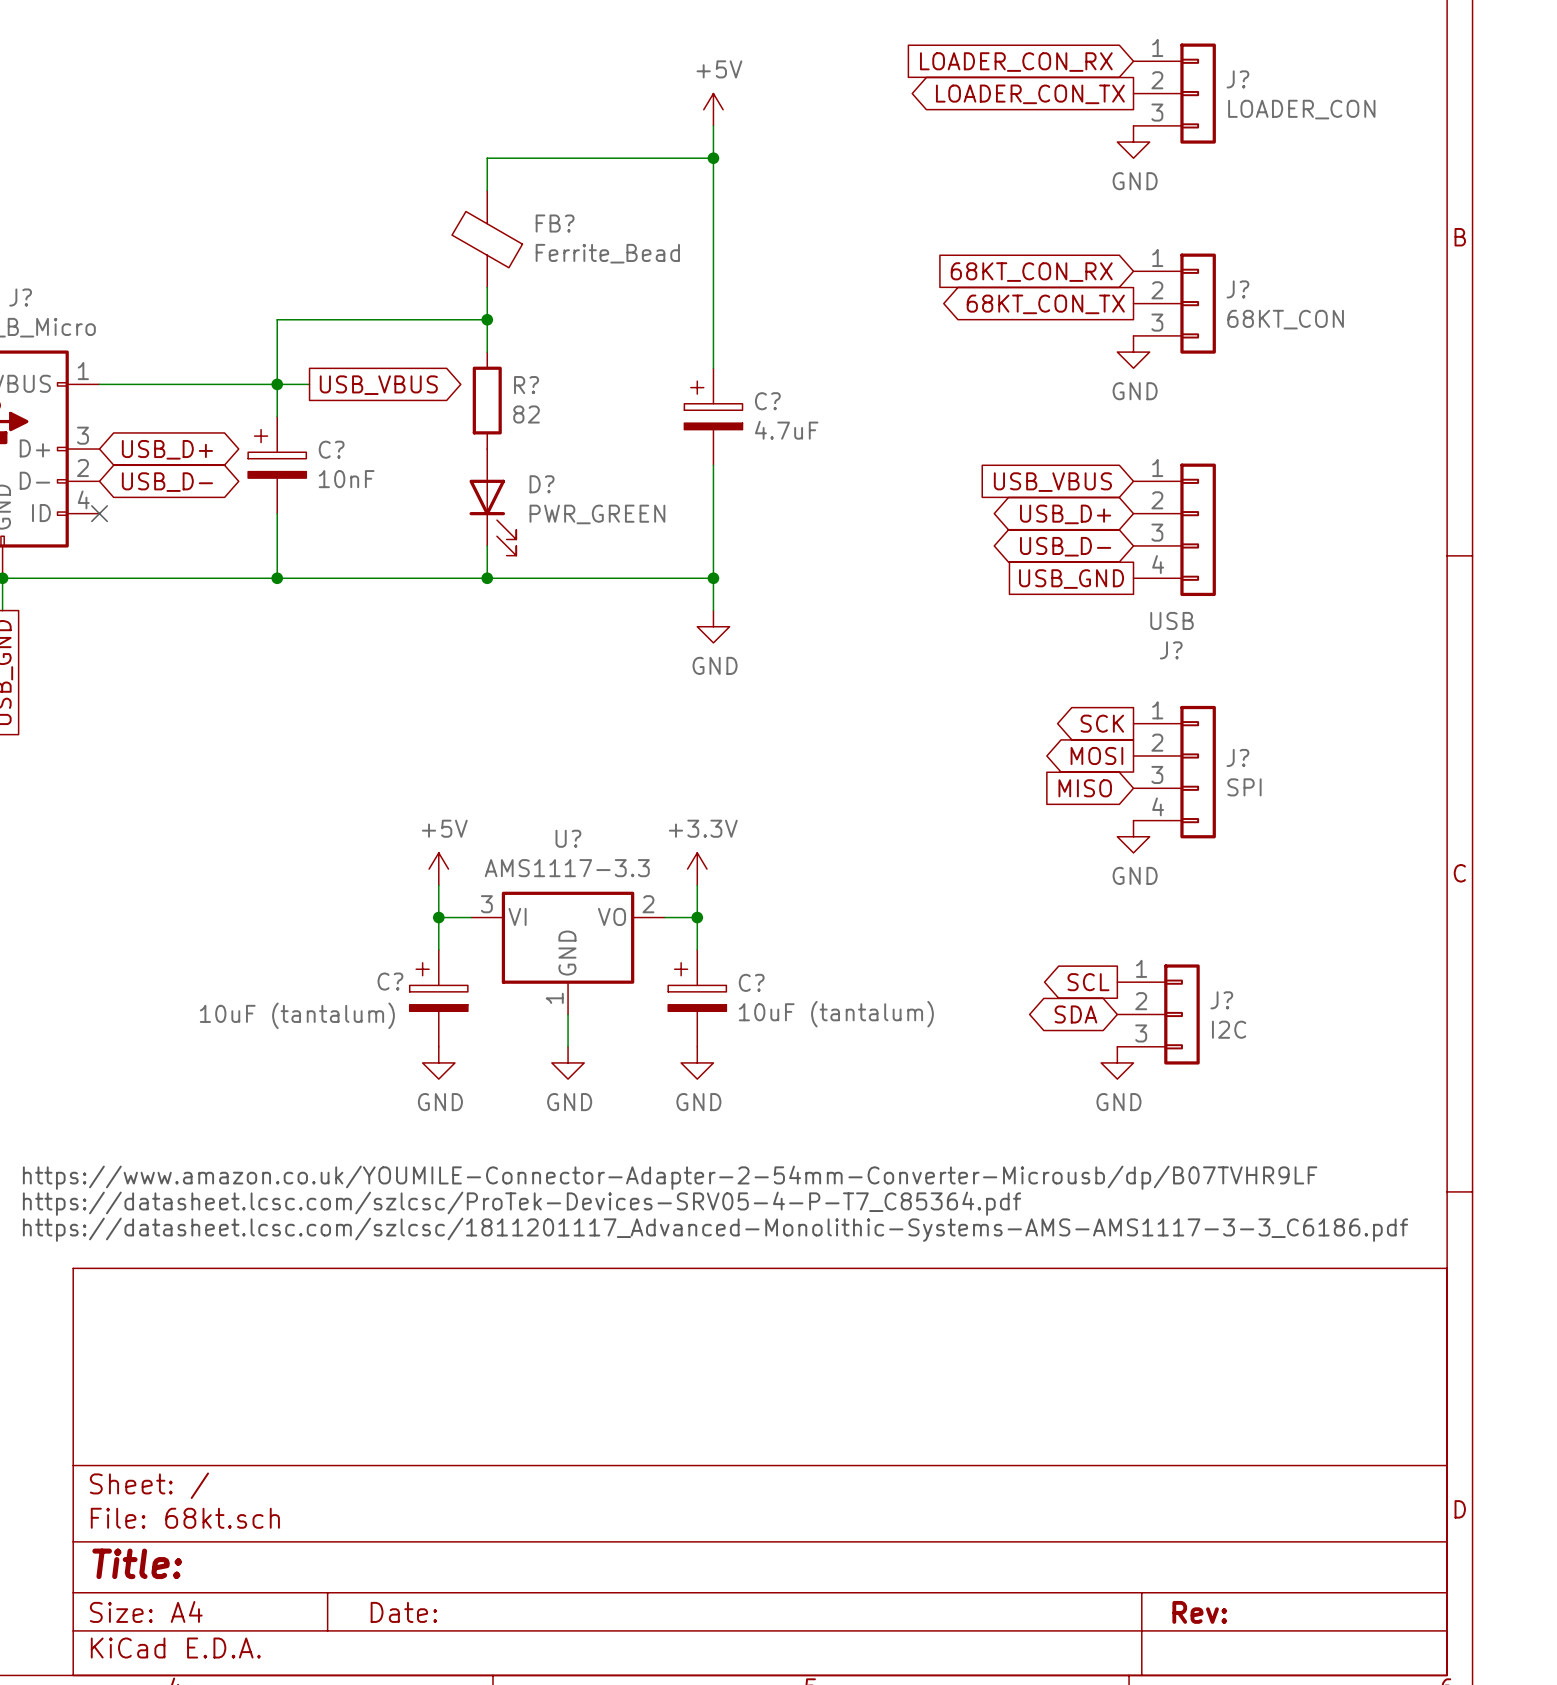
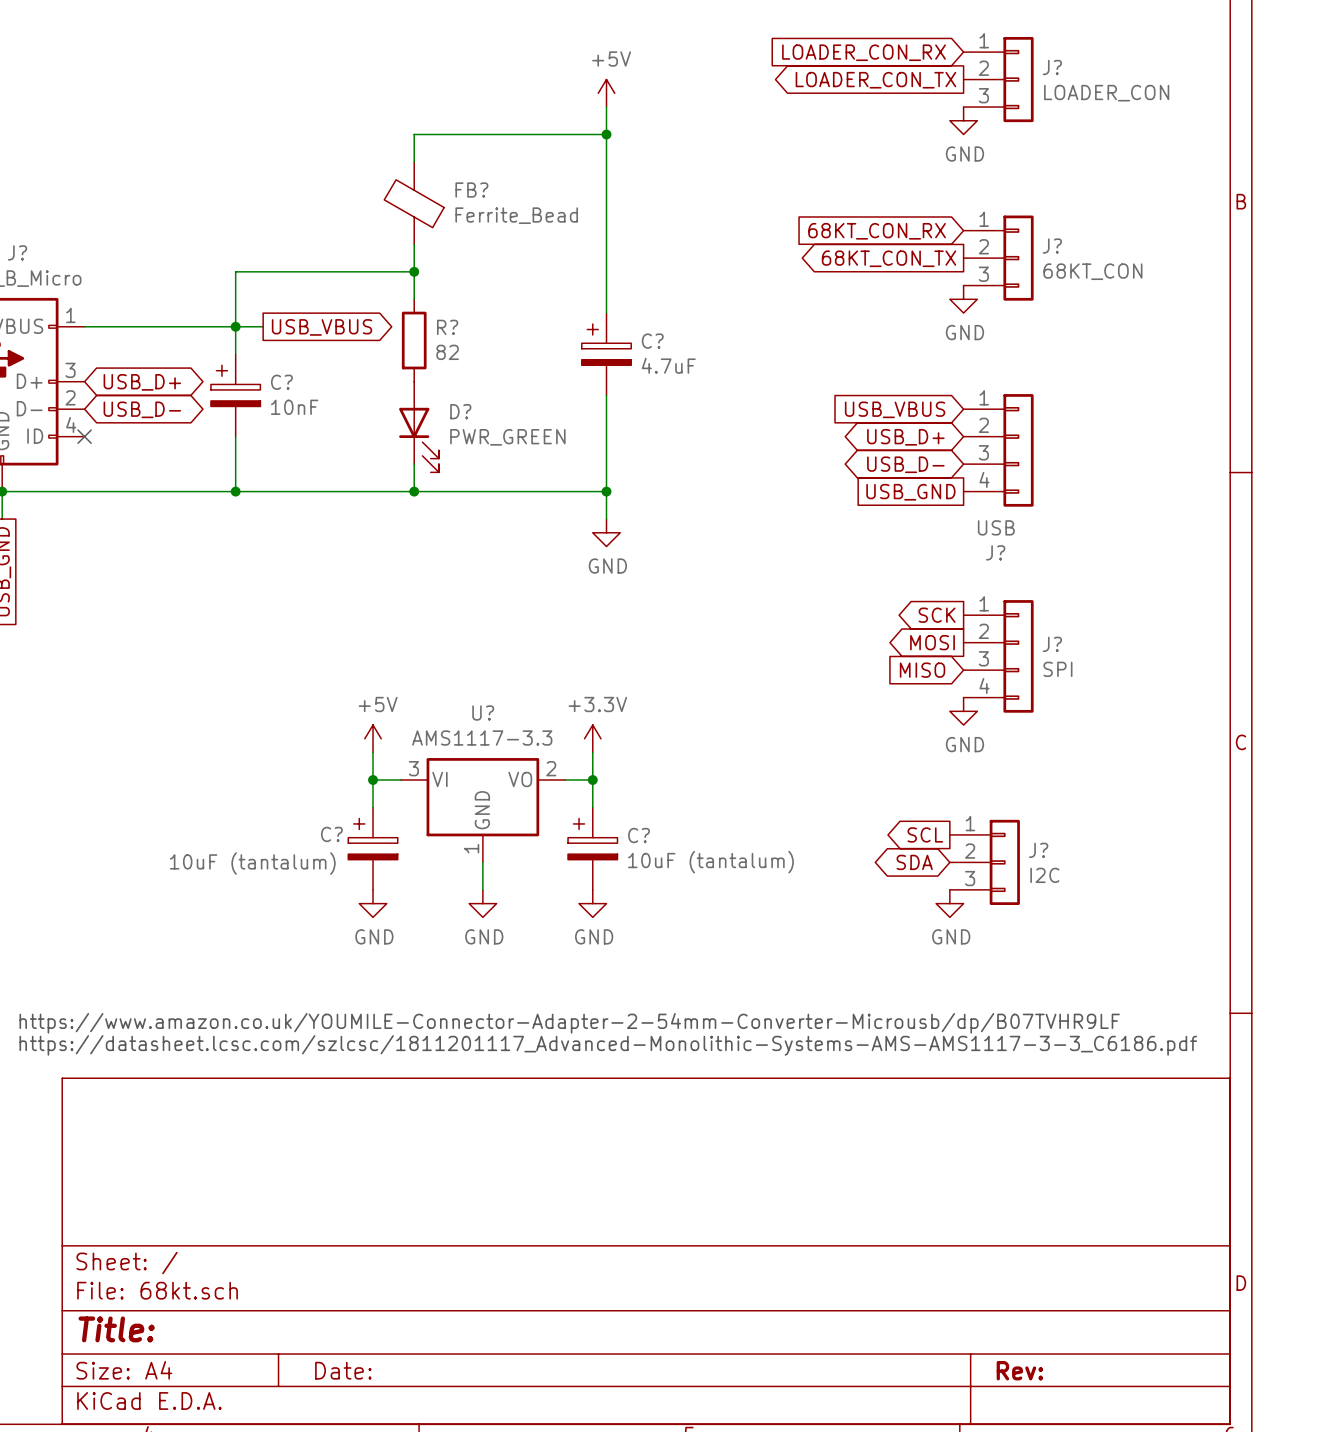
text: https://www.amazon.co.uk/YOUMILE-Connector-Adapter-2-54mm-Converter-Microusb/dp/B07TVHR9LF (670, 1177) -> none
text: https://datasheet.lcsc.com/szlcsc/ProTek-Devices-SRV05-4-P-T7_C85364.pdf (522, 1203) -> https://www.amazon.co.uk/YOUMILE-Connector-Adapter-2-54mm-Converter-Microusb/dp/B07TVHR9LF (569, 1023)

